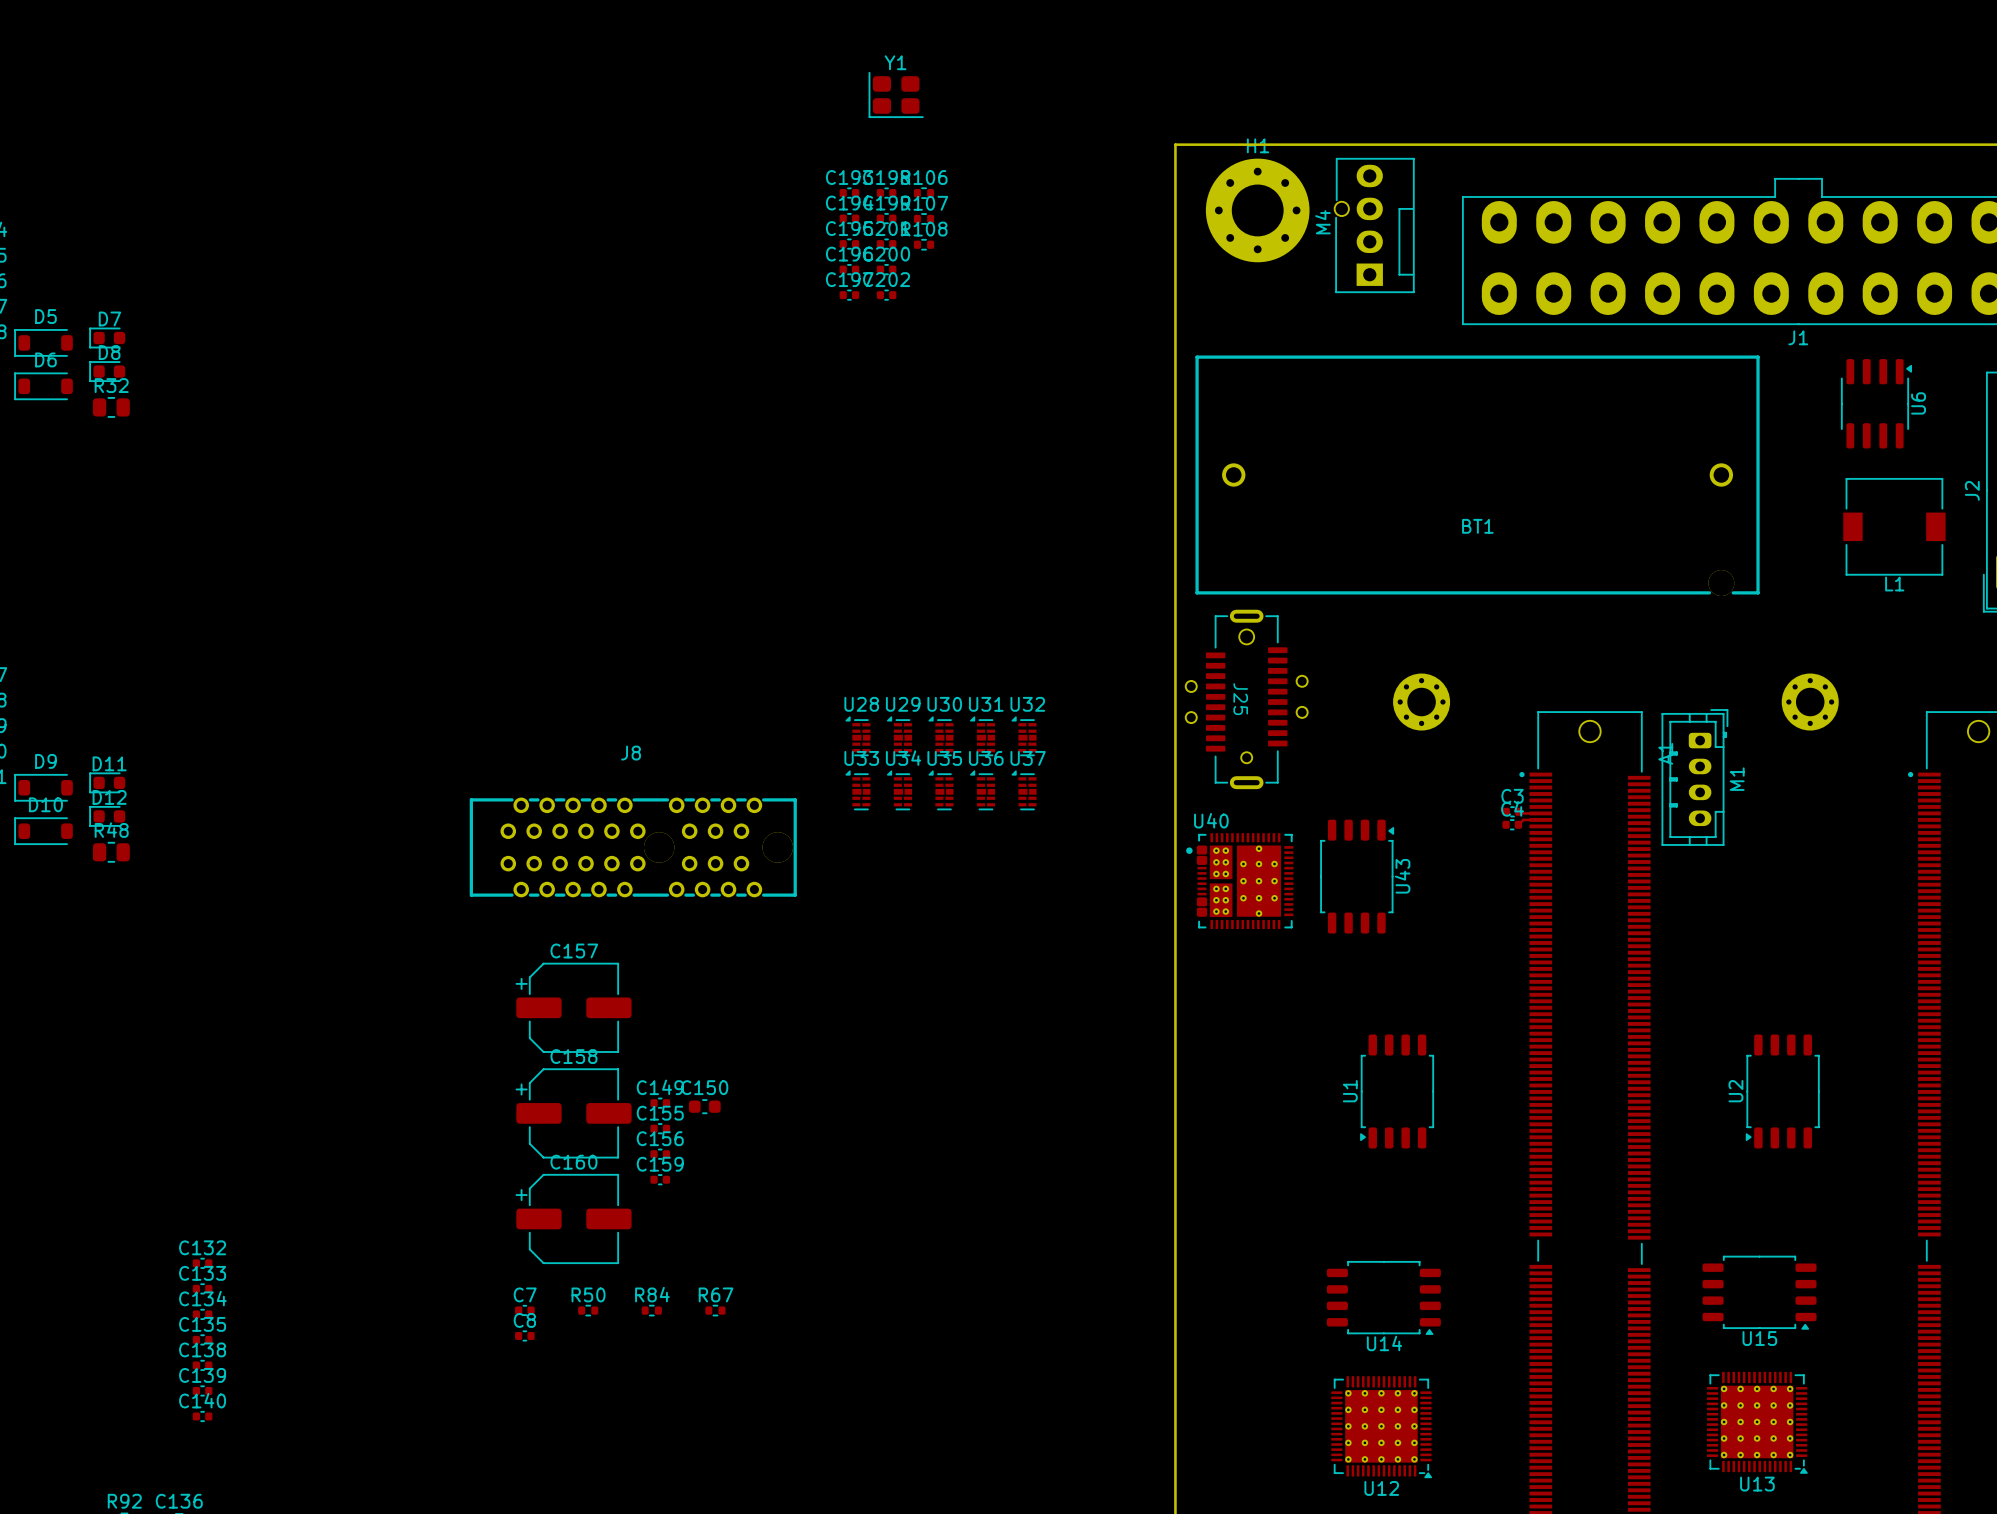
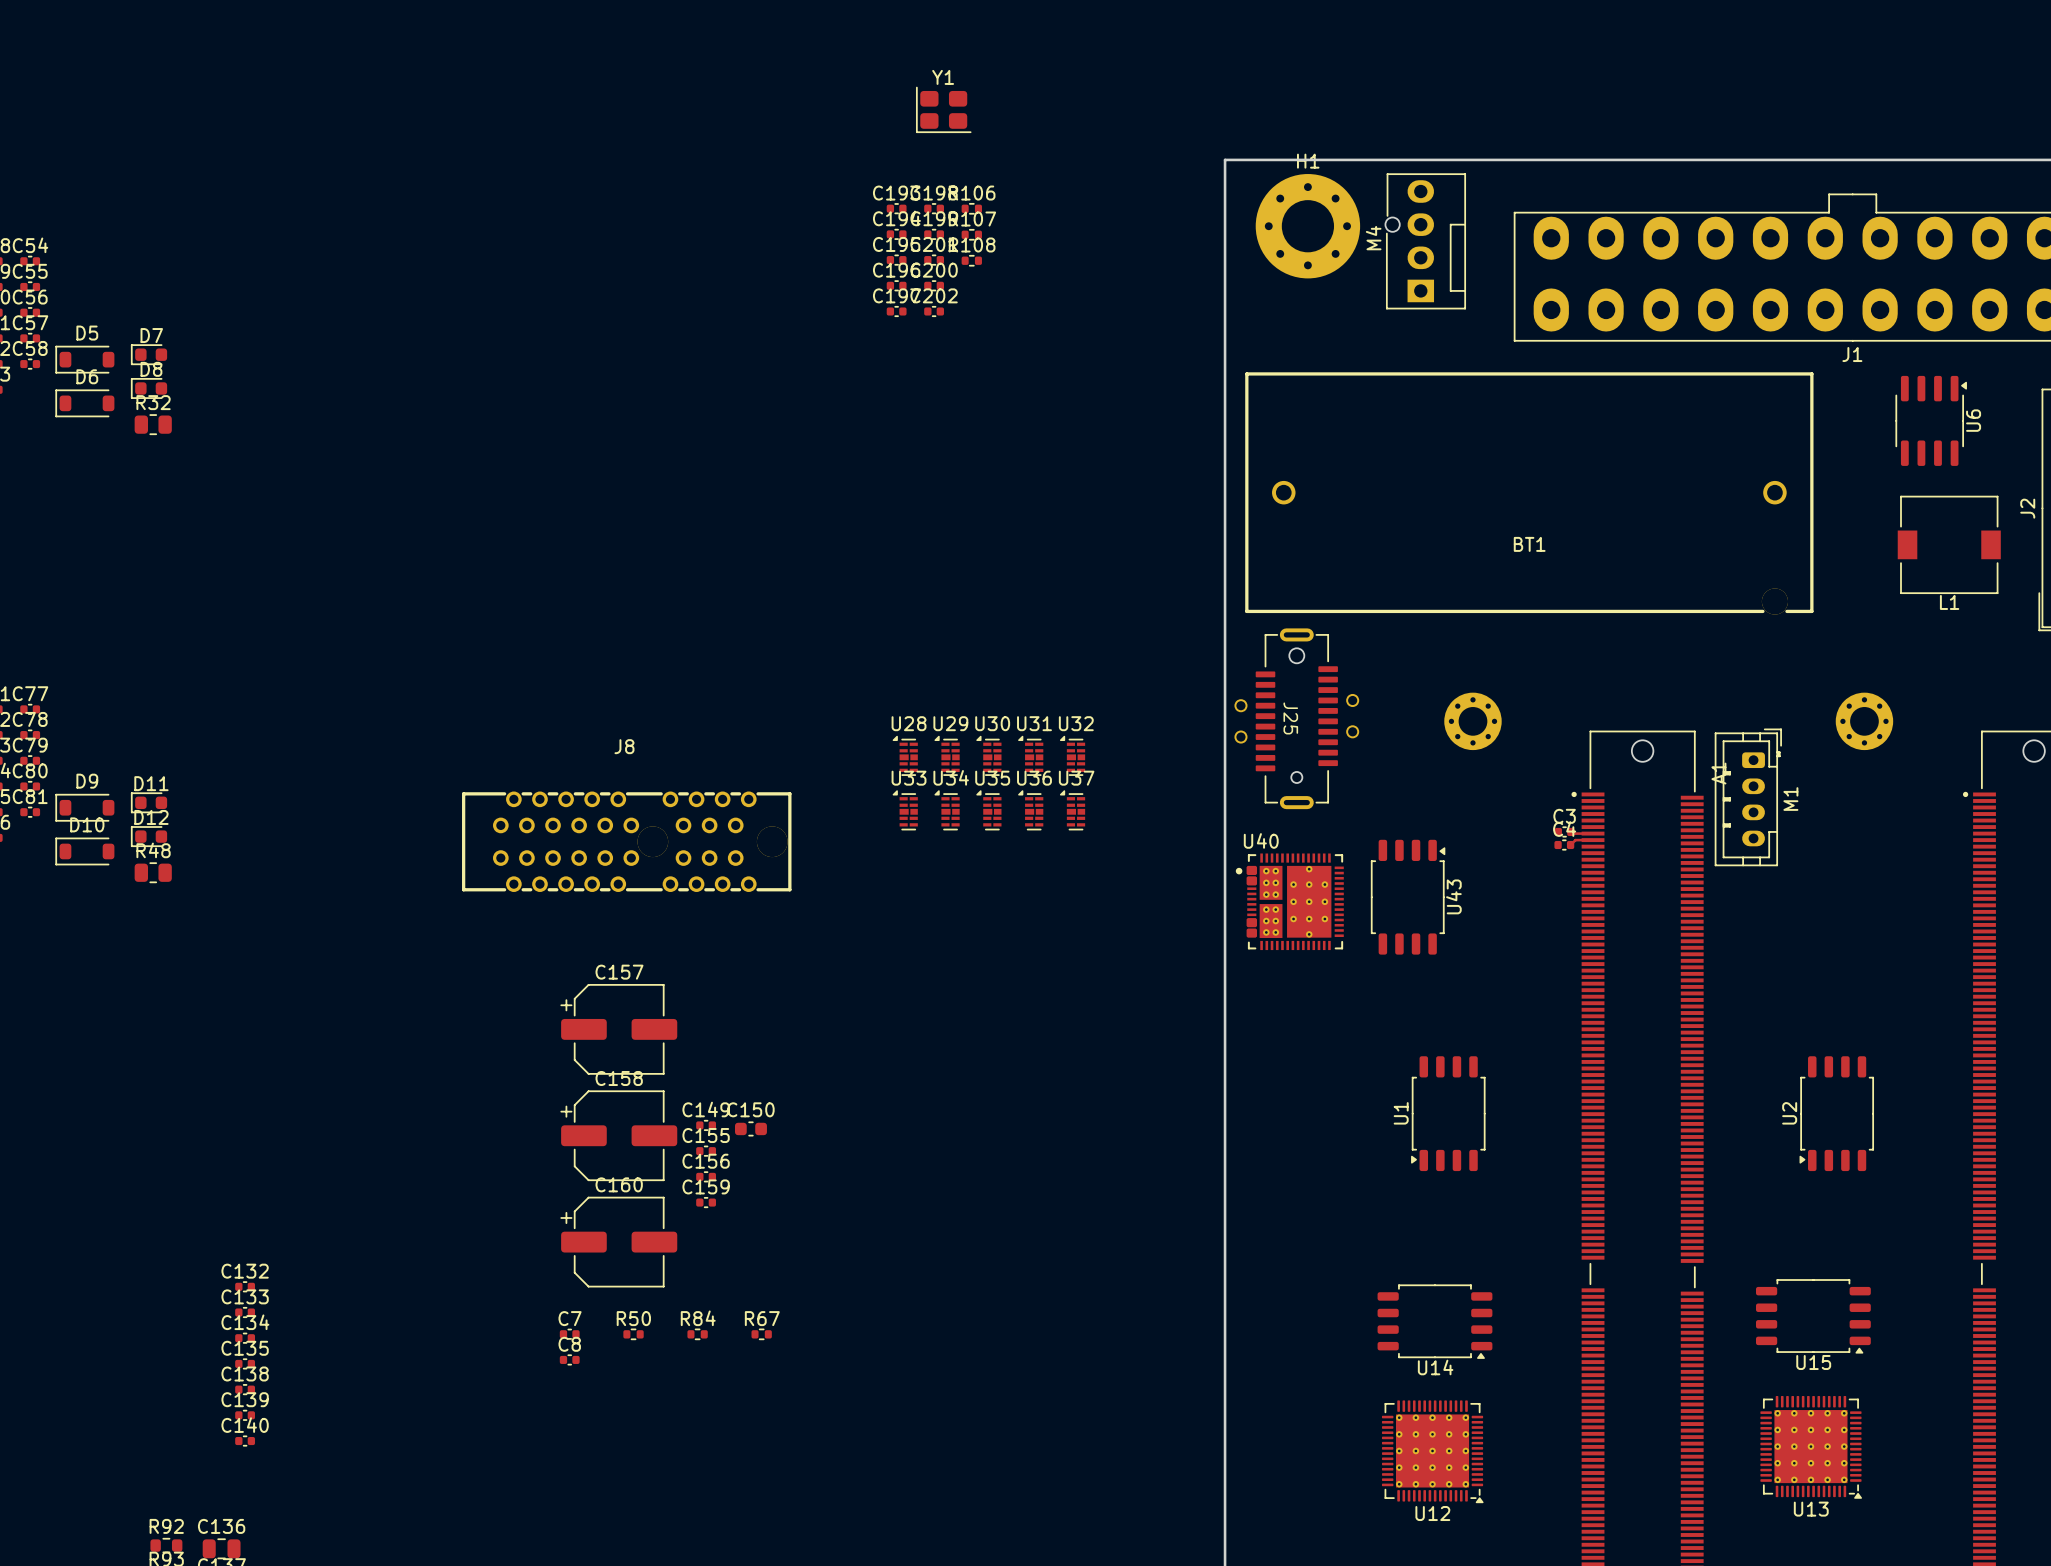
J8 position: (633, 847) -> (626, 841)

